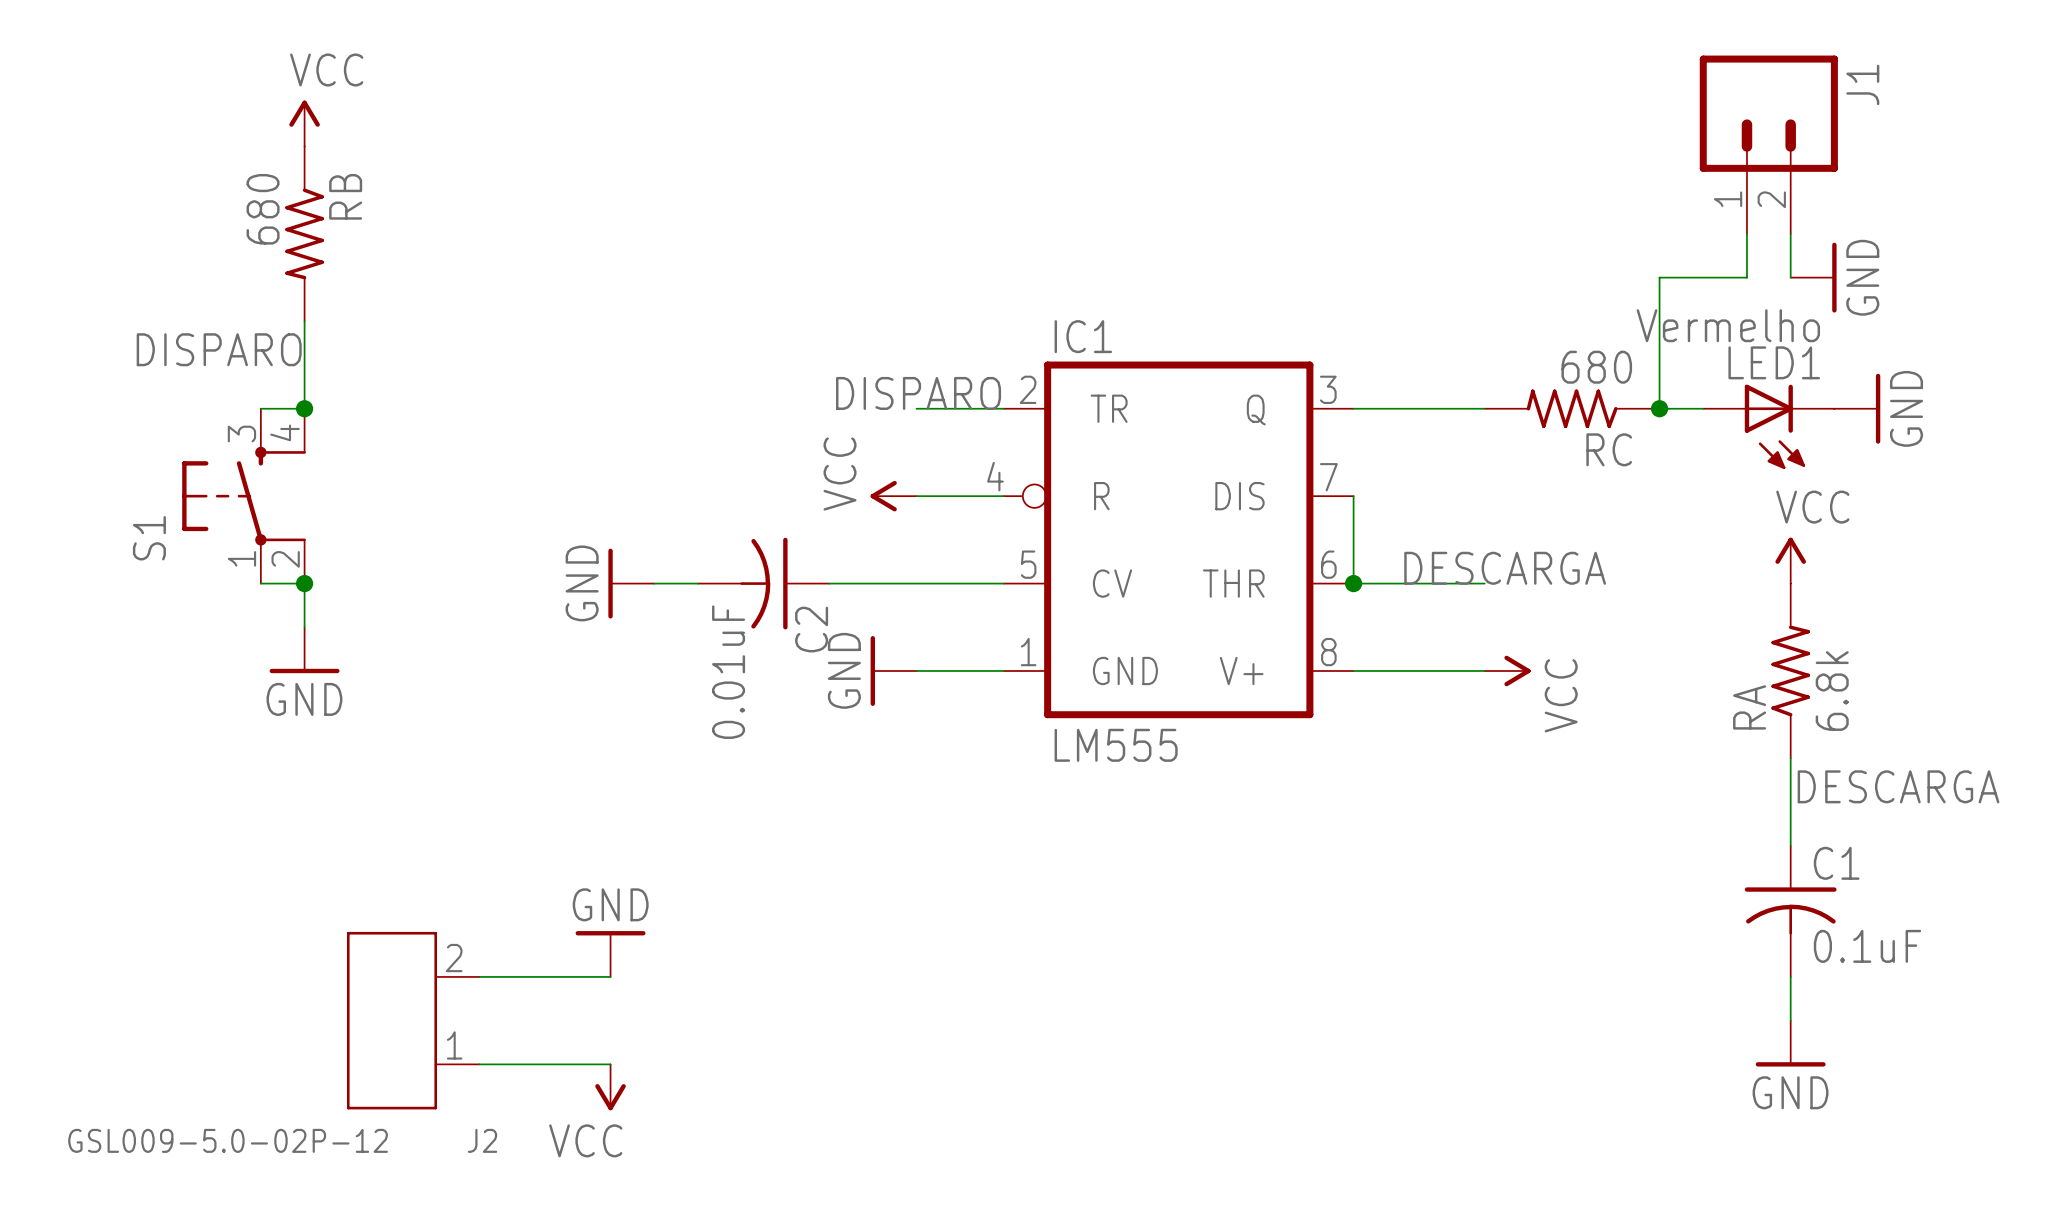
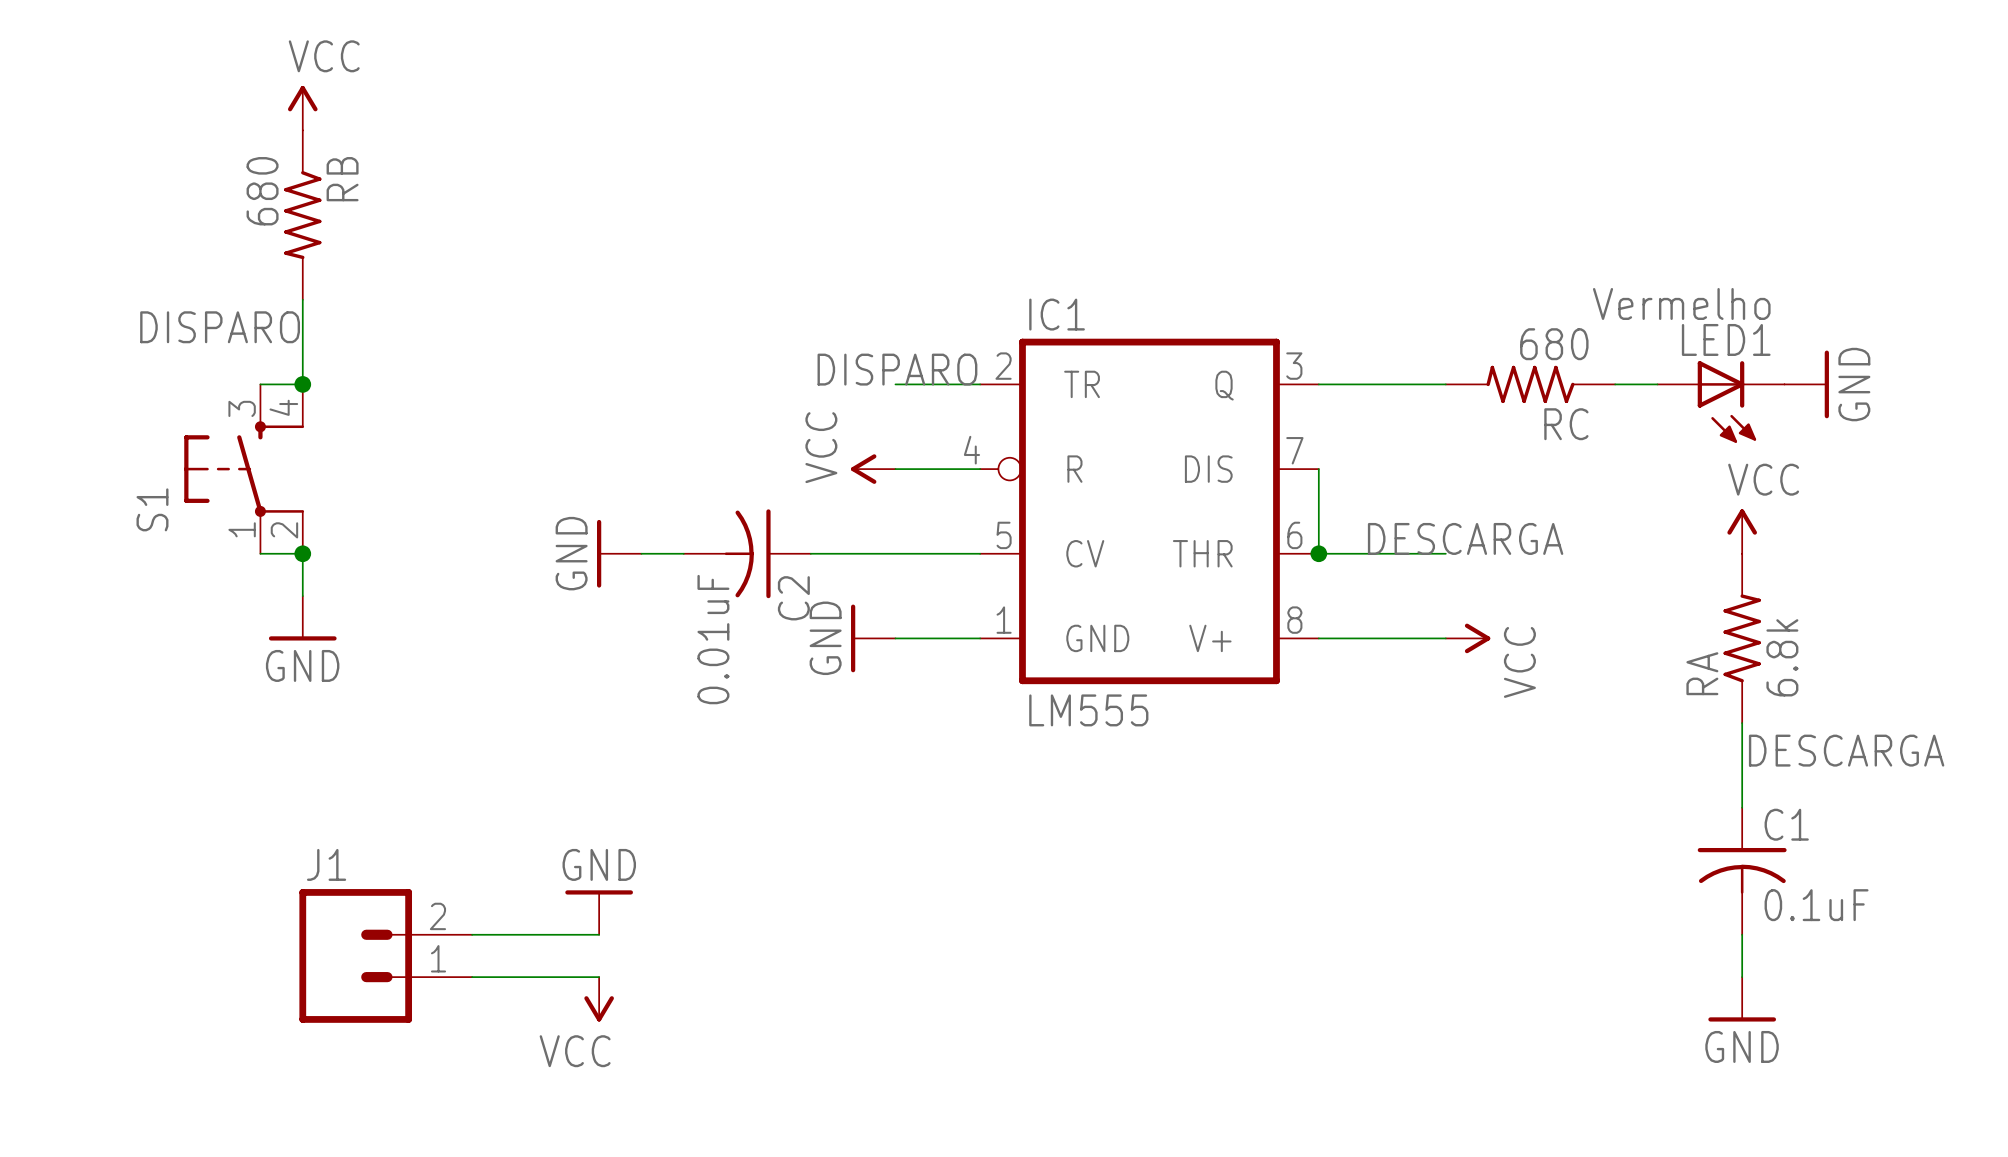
J1 rotation: 0° (1768, 113) -> 90° counterclockwise (355, 955)
J1 position: (1768, 144) -> (385, 955)
wire: (1746, 233) (1746, 277) (1659, 277) (1659, 408) -> none
wire: (1790, 233) (1790, 277) -> none
power symbol: GND (1813, 277) -> none
junction: (1659, 408) -> none
J2: GSL009-5.0-02P-12 (413, 1020) -> none
wire: (479, 1064) (610, 1064) -> (472, 977) (599, 977)
power symbol position: VCC (610, 1087) -> VCC (599, 999)

